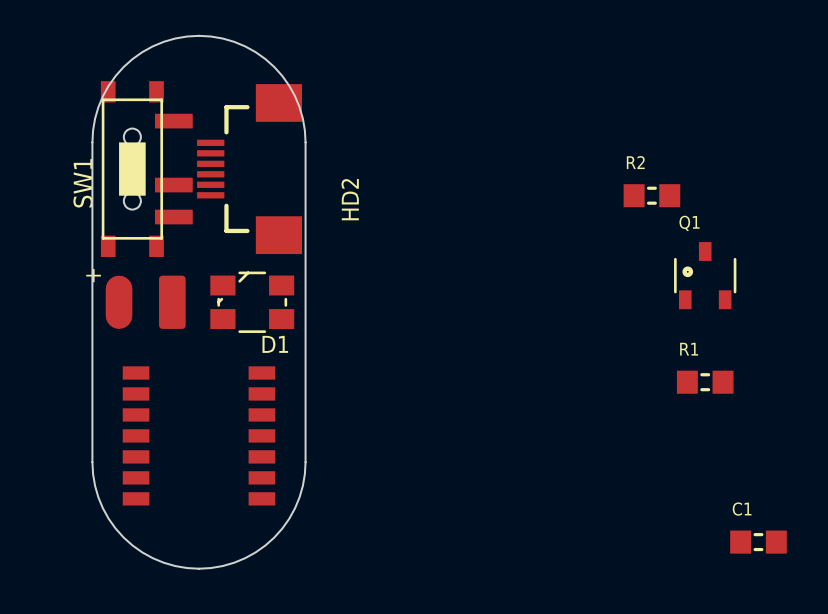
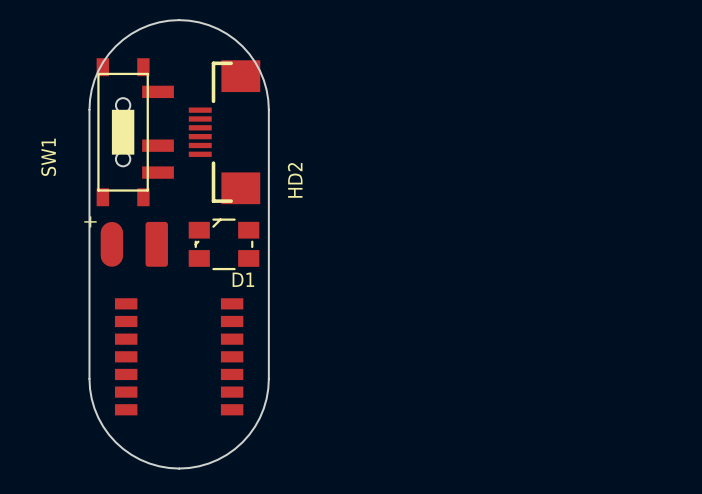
HD2 footprint: [197, 84, 302, 255] -> [188, 60, 261, 205]
SW1 name position: SW1 (83, 183) -> SW1 (48, 157)
R2: (651, 195) -> none
Q1: (705, 275) -> none
R1: (705, 382) -> none
C1: (758, 542) -> none

